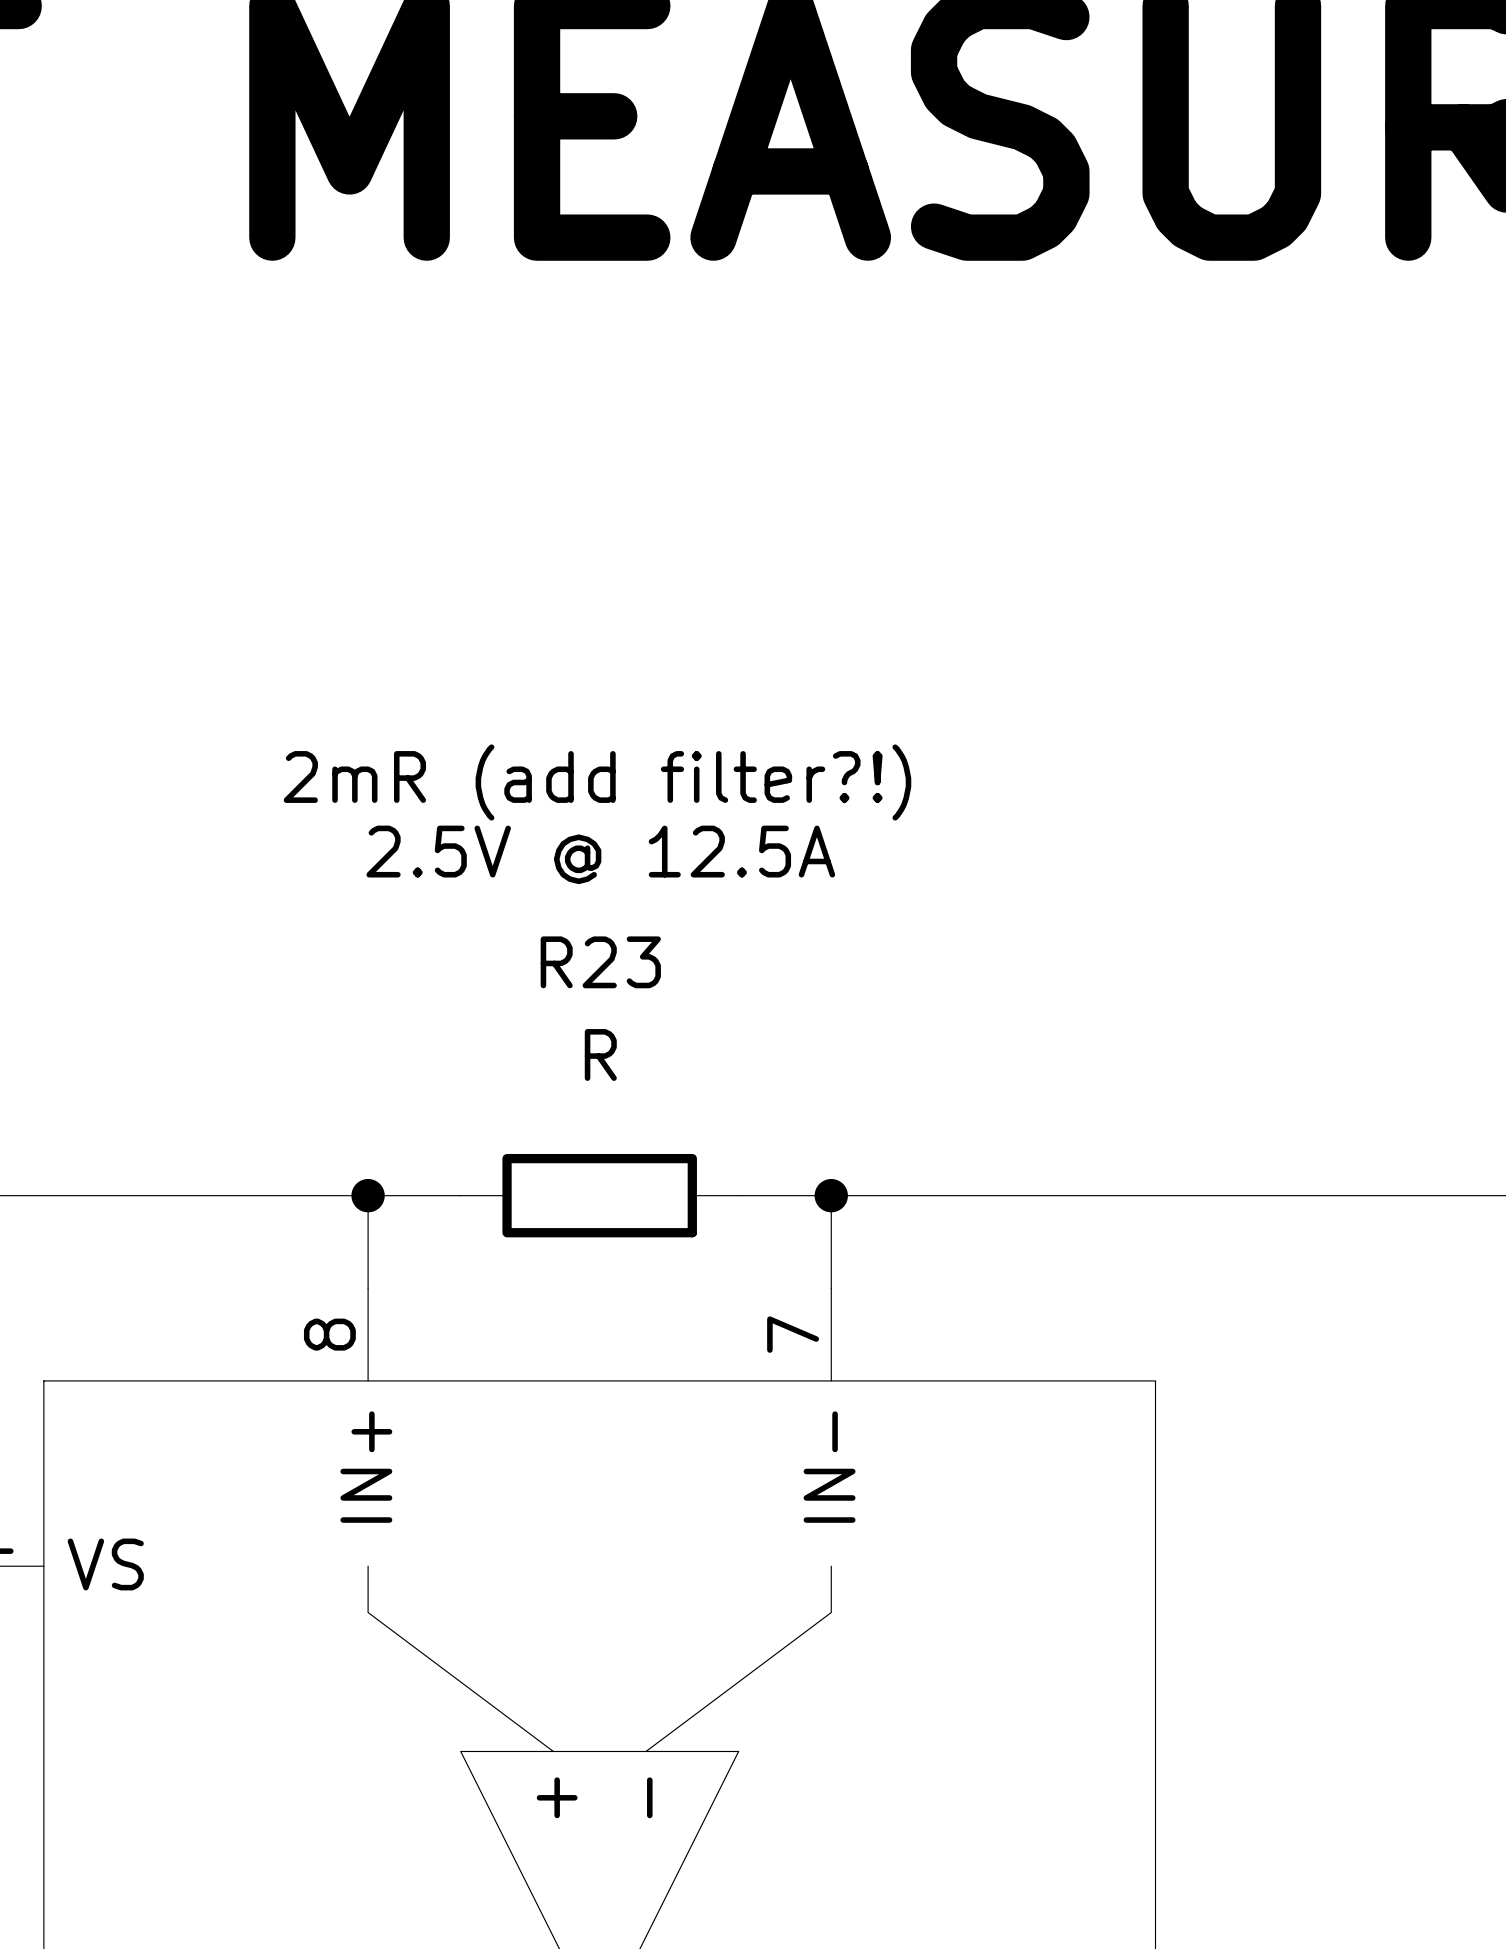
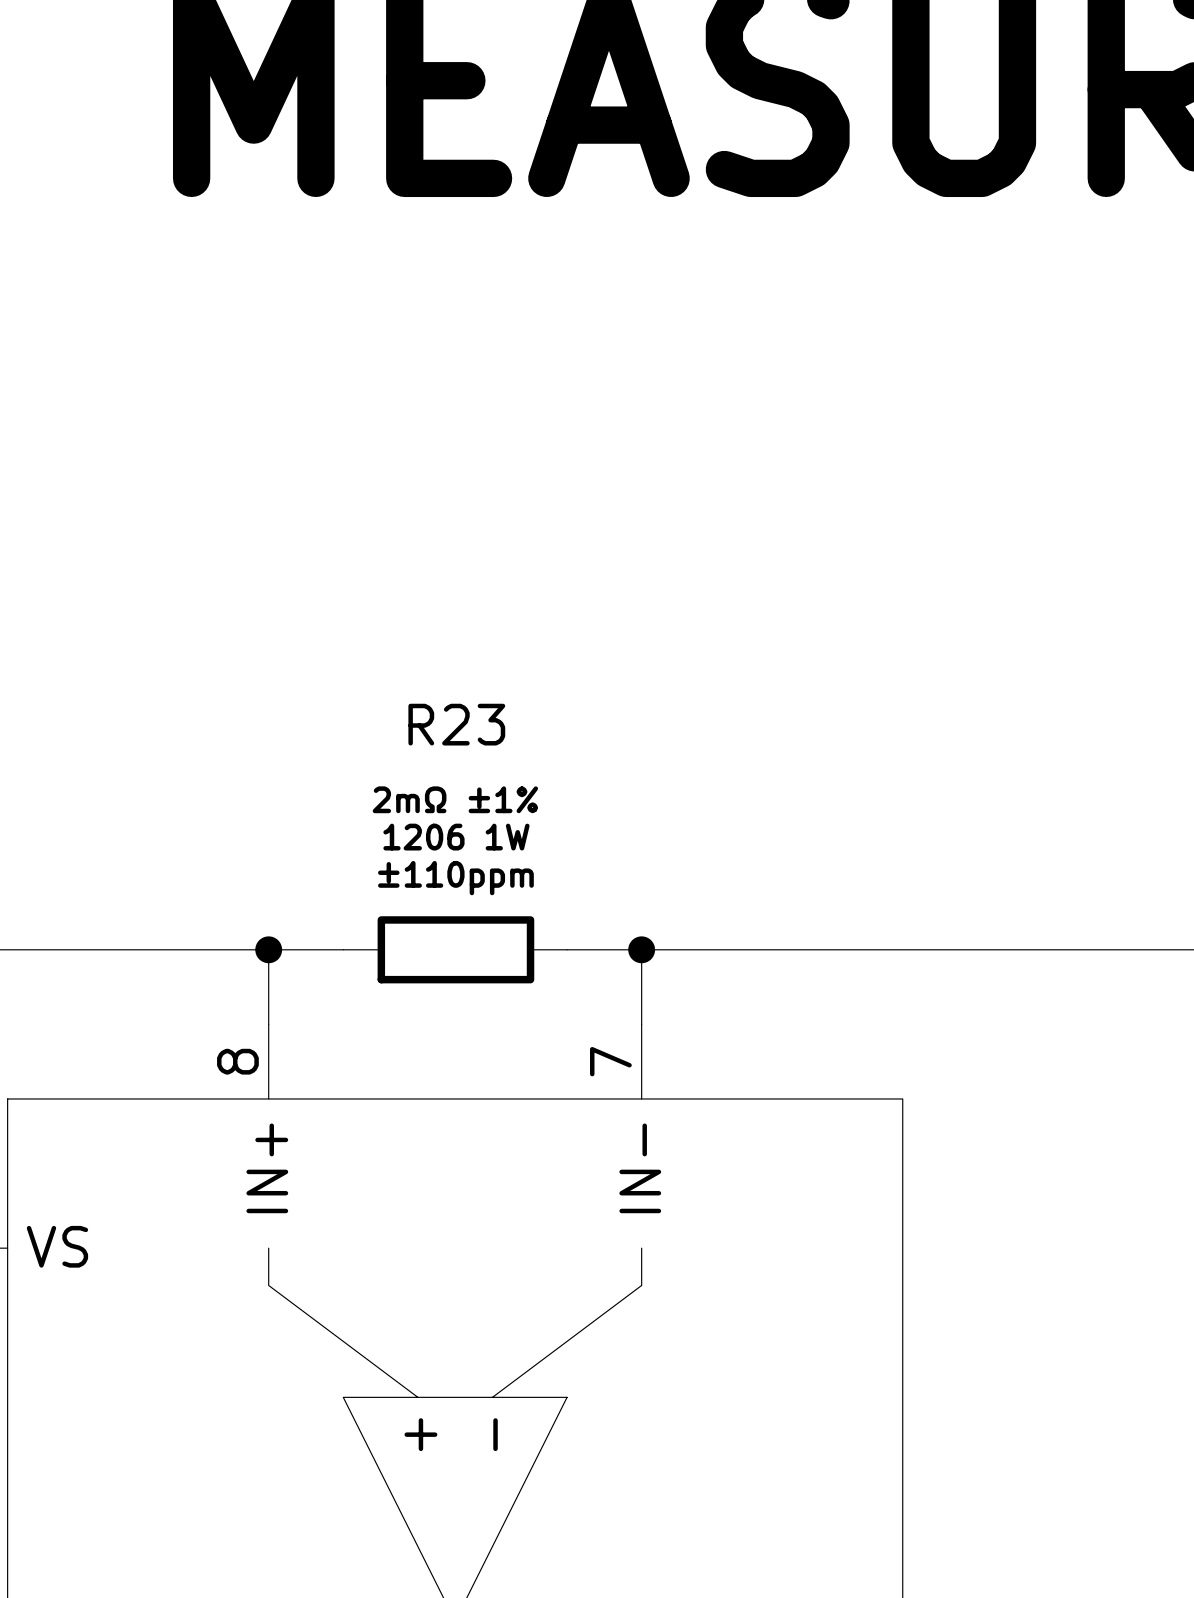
text: 2mR (add filter?!) (597, 782) -> none
text: 2.5V @ 12.5A (600, 854) -> none
R23 name position: R23 (600, 962) -> R23 (456, 724)
R23 text: none -> 2mΩ ±1% (455, 799)
R23 value: R (600, 1054) -> none
R23 text: none -> 1206 1W (456, 837)
R23 text: none -> ±110ppm (455, 878)

